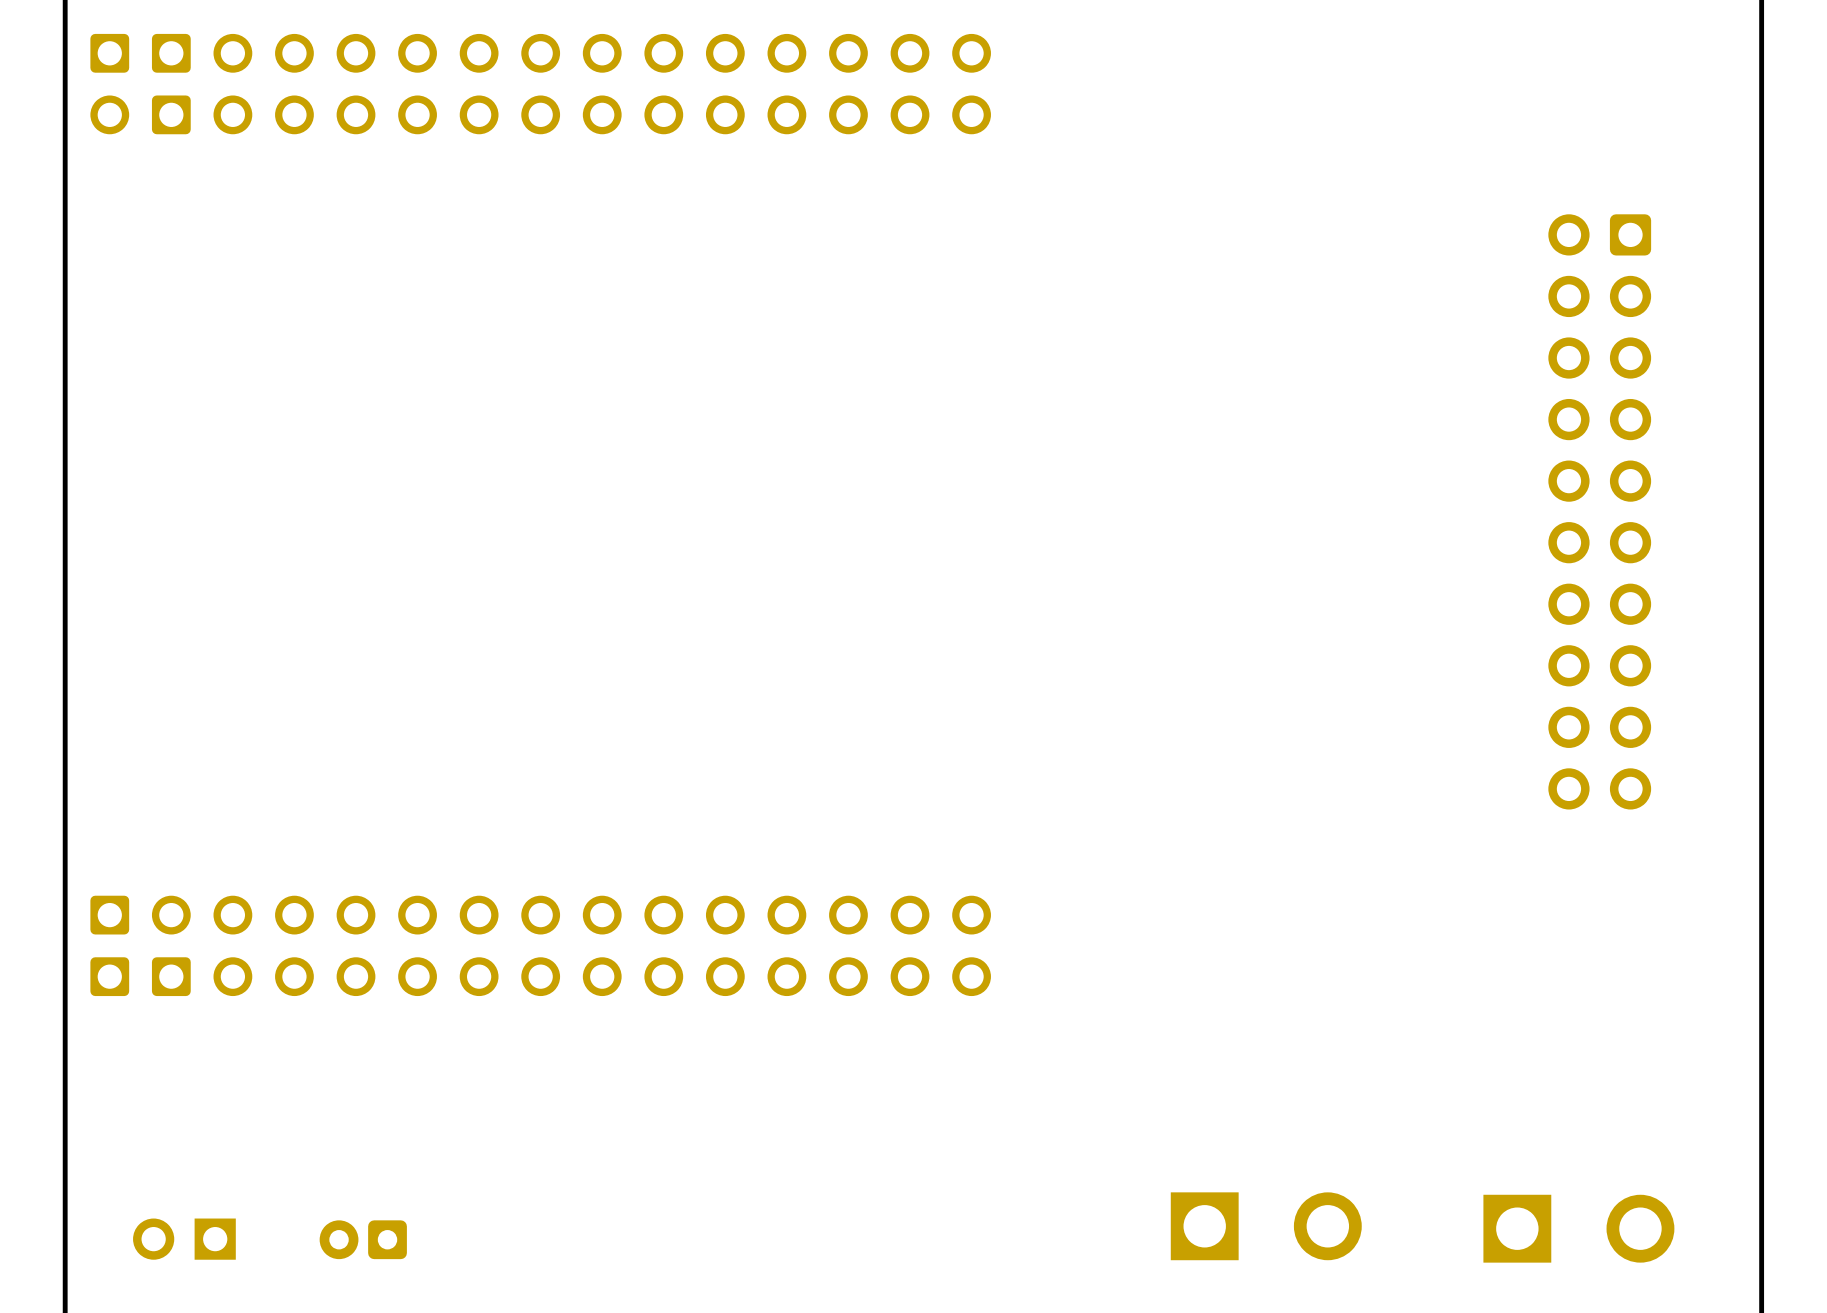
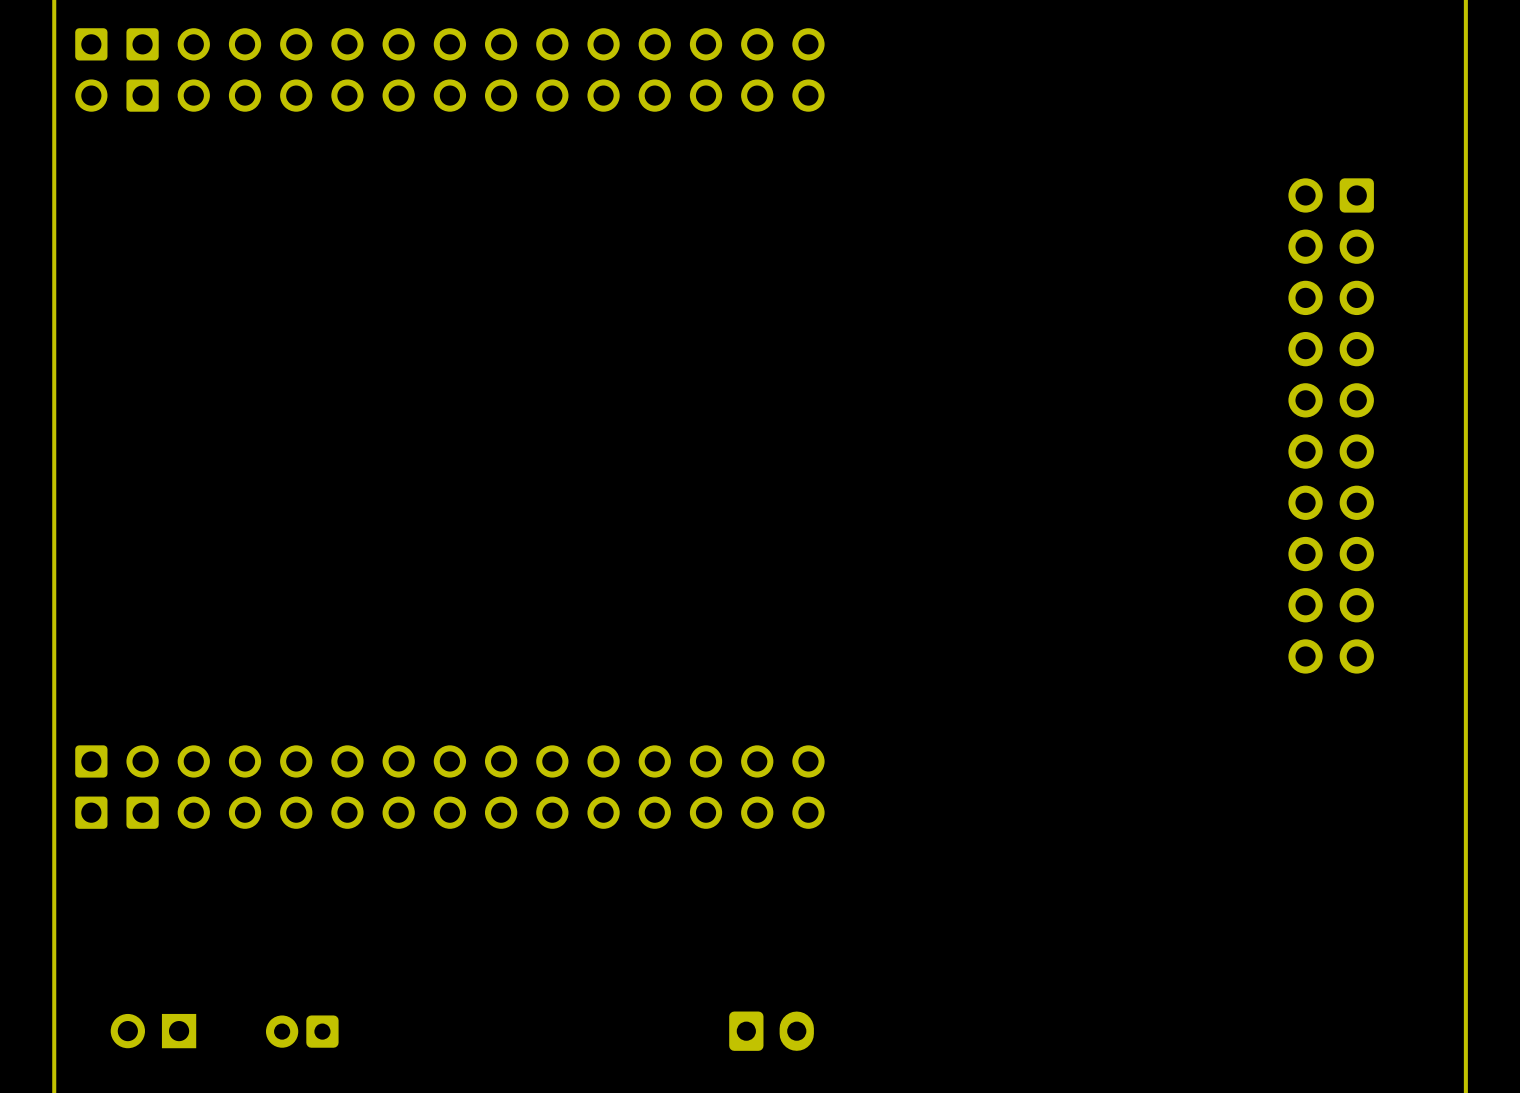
part: (1266, 1226) -> none
part: (1578, 1228) -> none
part: none -> (771, 1031)

